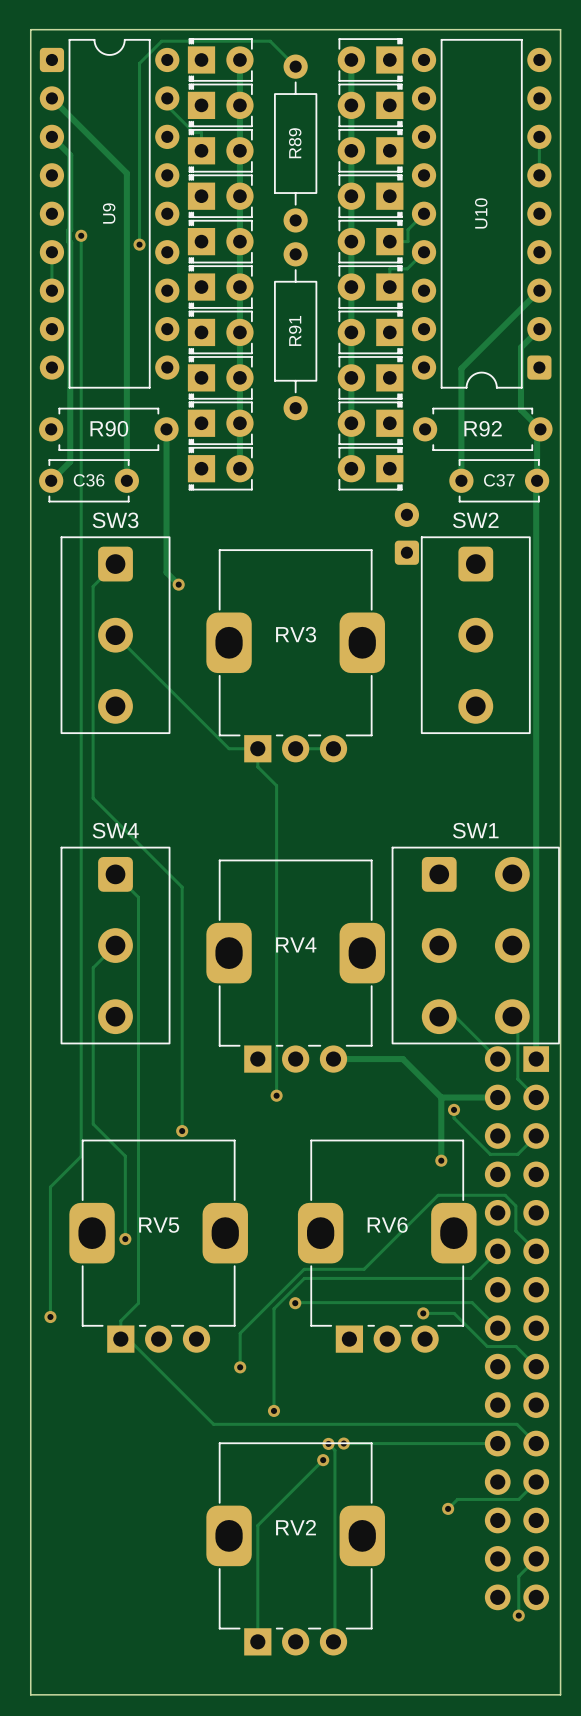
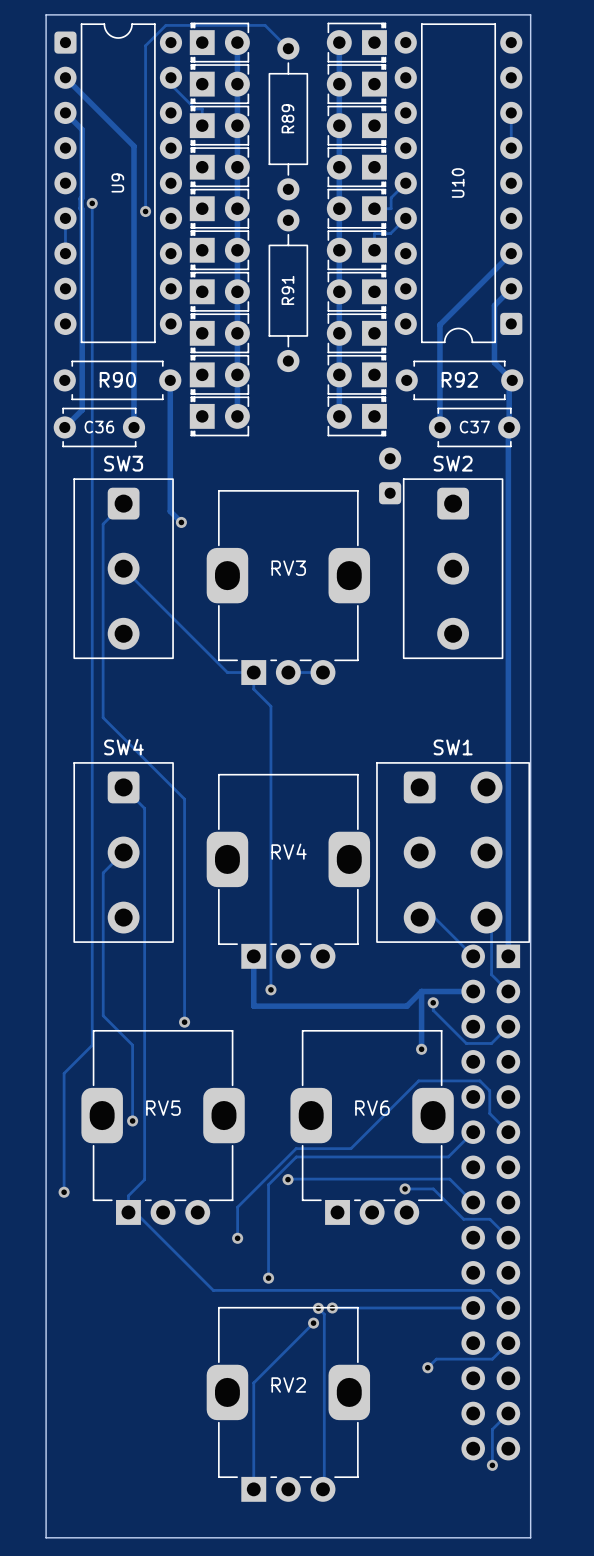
track: (333, 1059) (402, 1059) (441, 1097) -> (253, 956) (253, 1006) (406, 1006) (421, 991)

